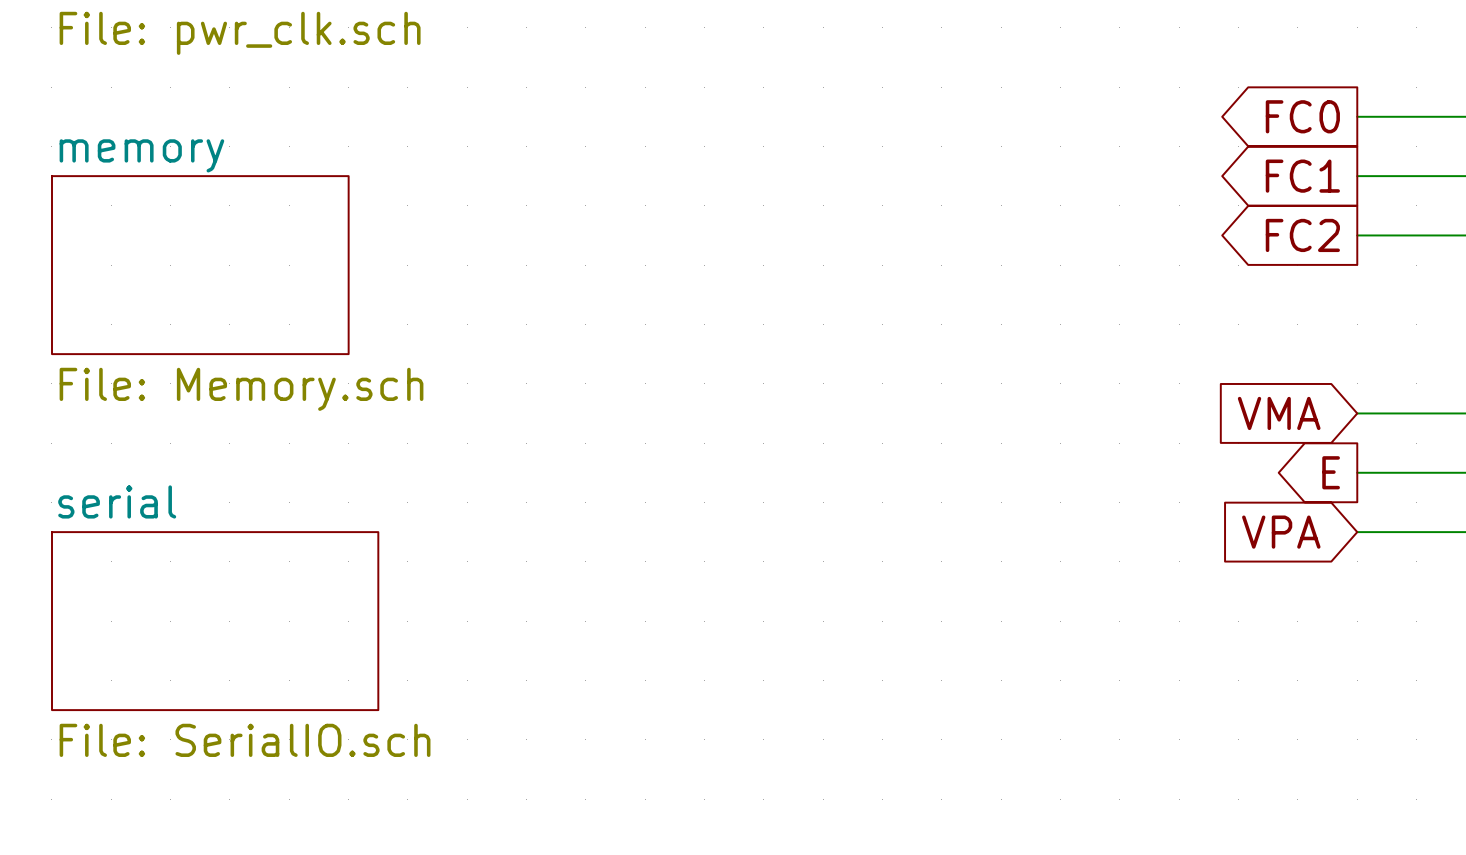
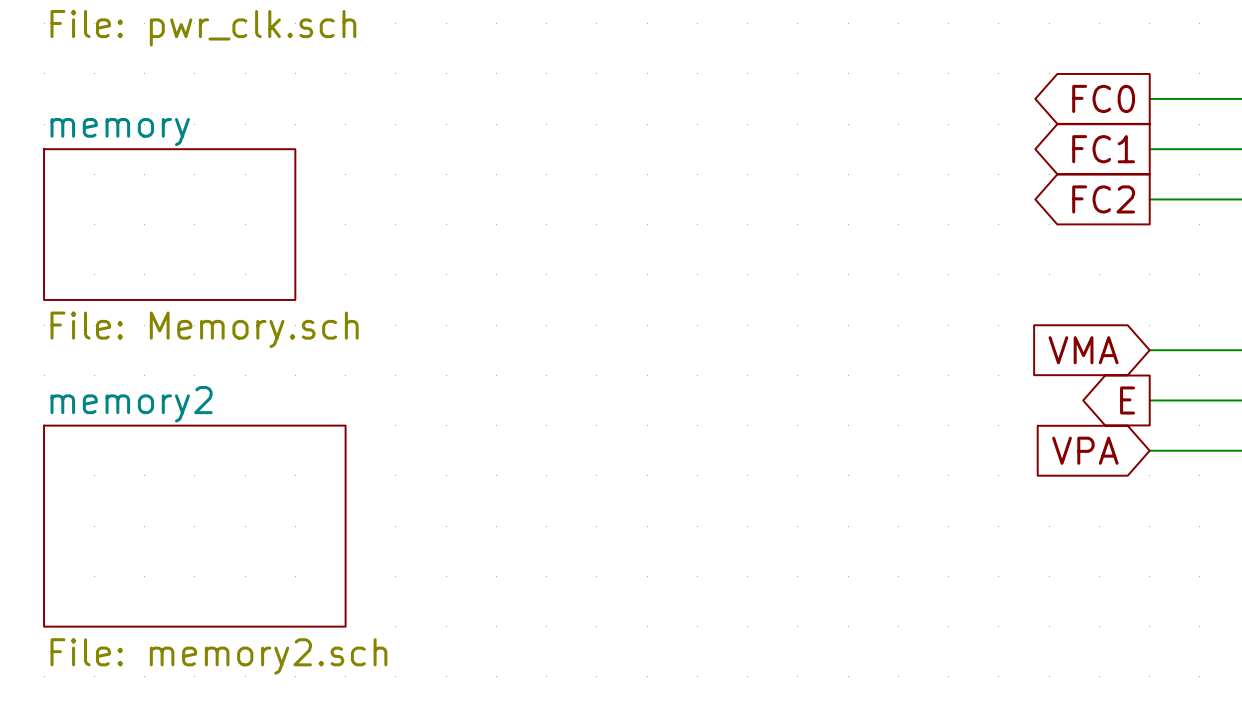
sheet serial: File: SerialIO.sch (215, 621) -> none
sheet memory2: none -> File: memory2.sch (194, 526)

